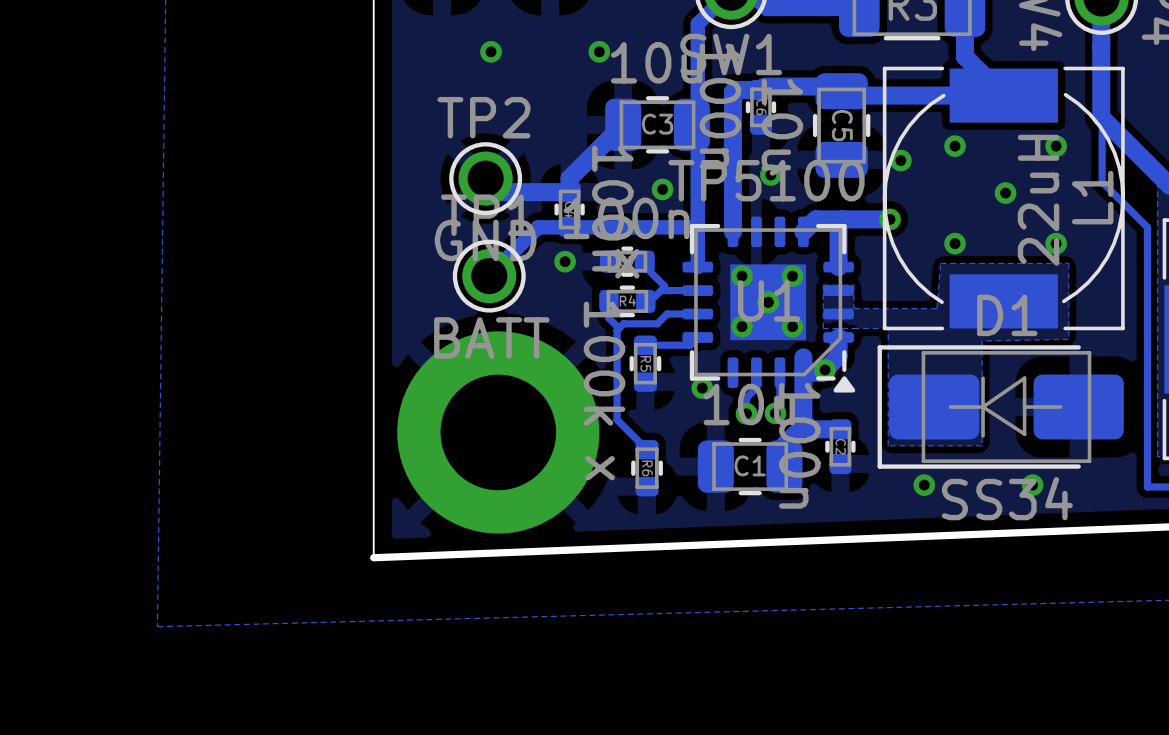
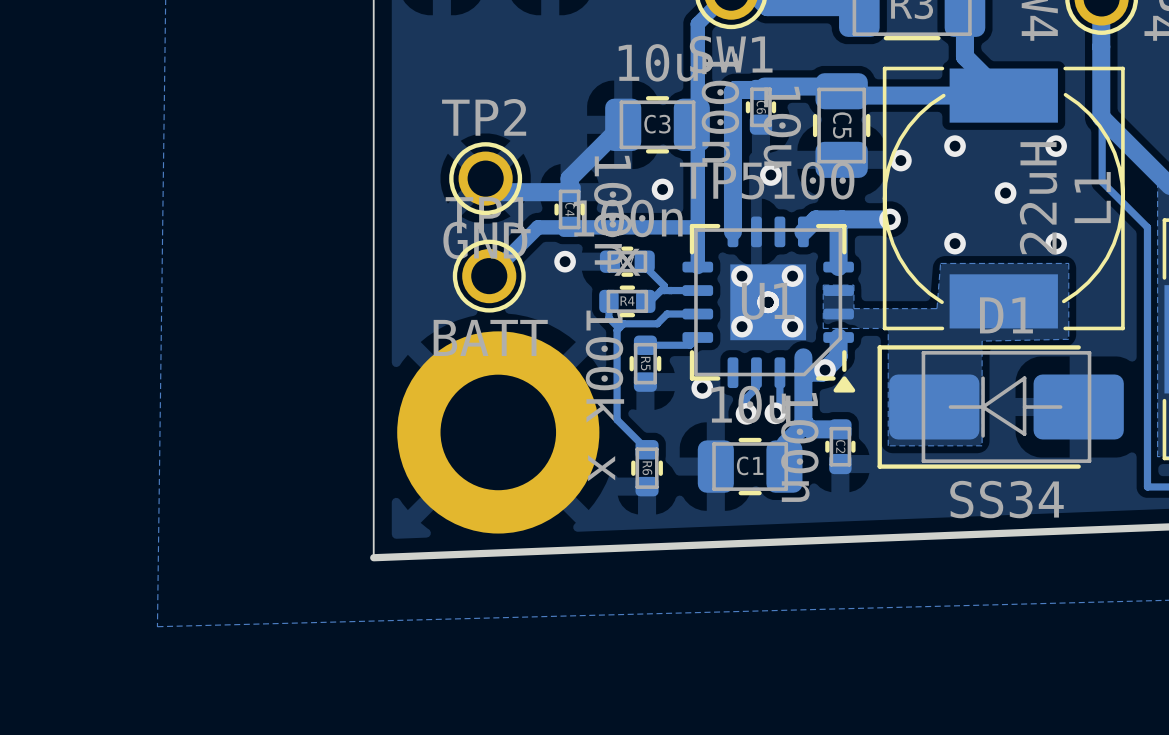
via: (491, 51) -> none
via: (599, 51) -> none
via: (924, 485) -> none
via: (1032, 485) -> none

